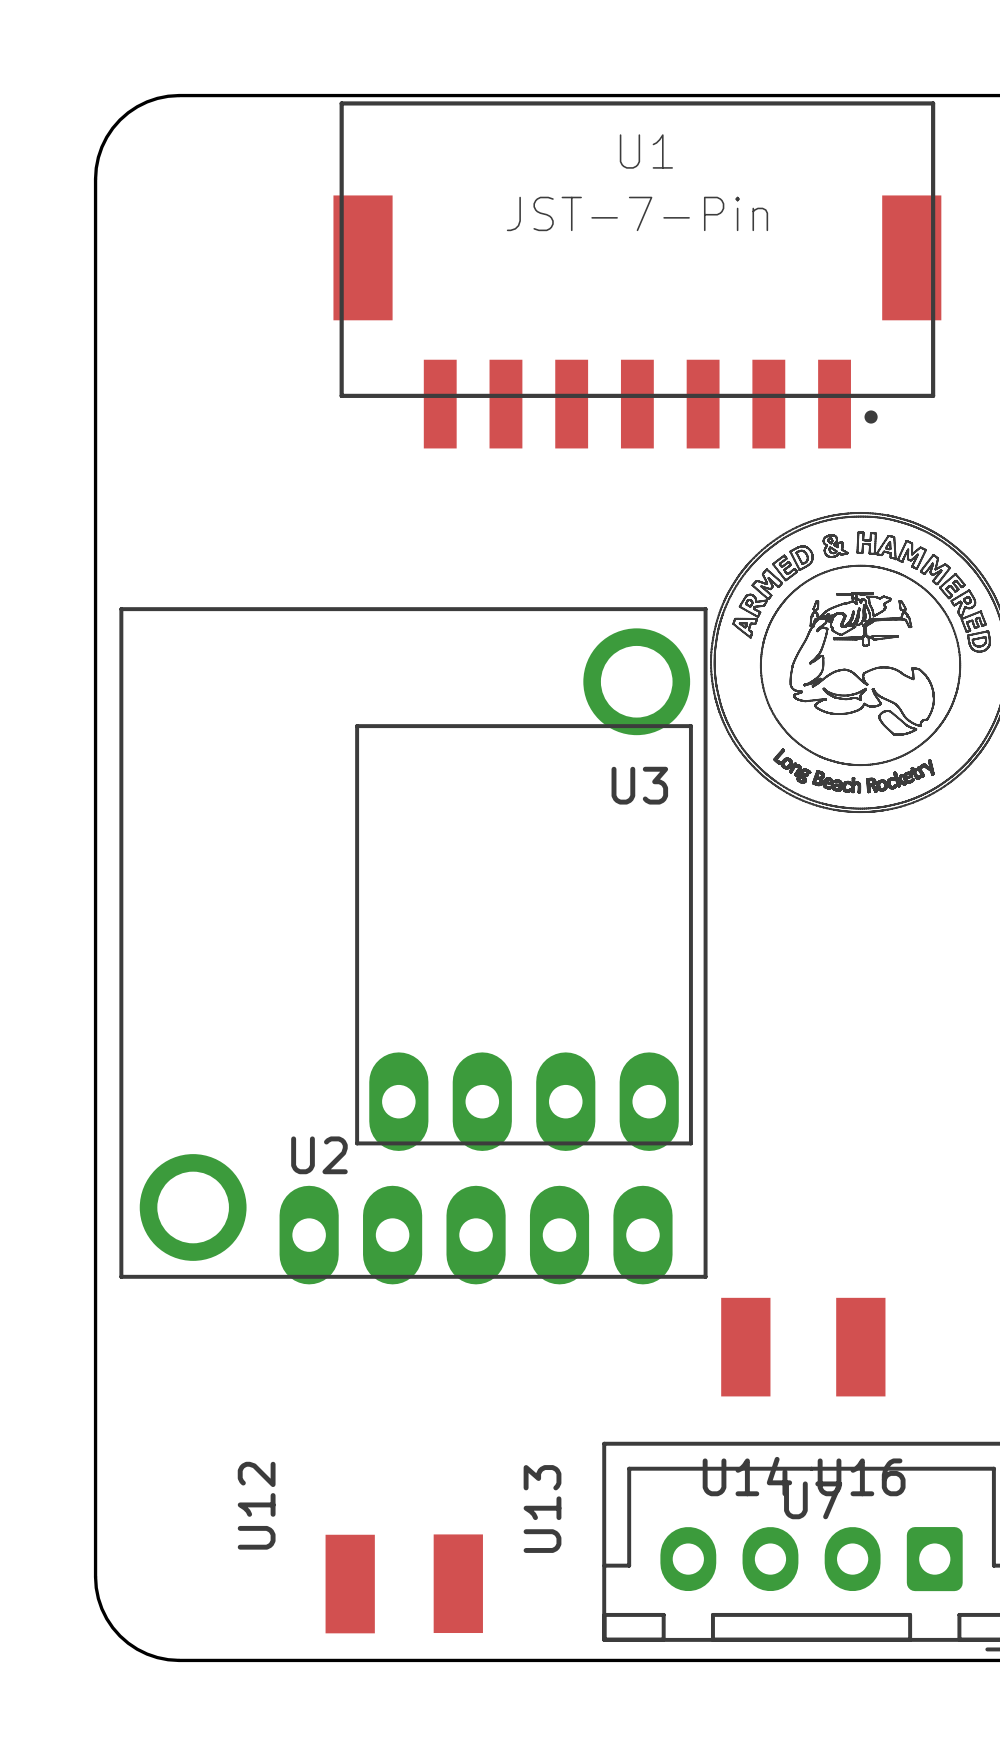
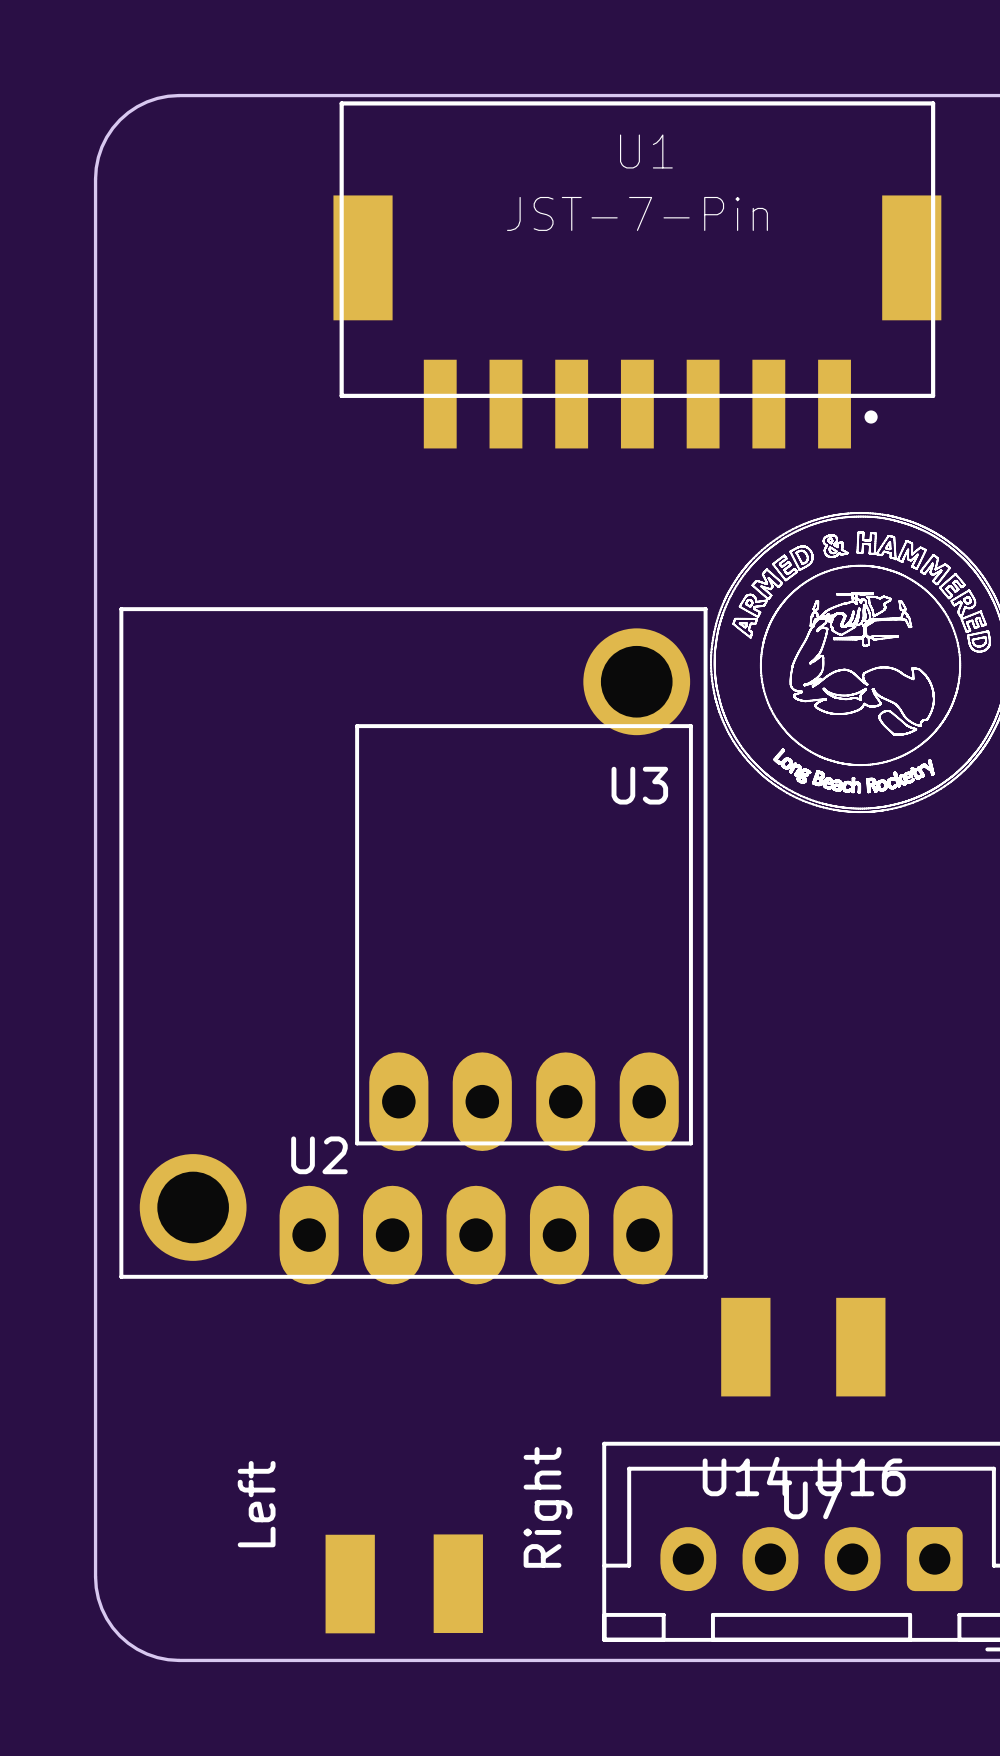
U12 name: U12 (256, 1505) -> Left (256, 1504)
U13 name: U13 (542, 1509) -> Right (547, 1507)

